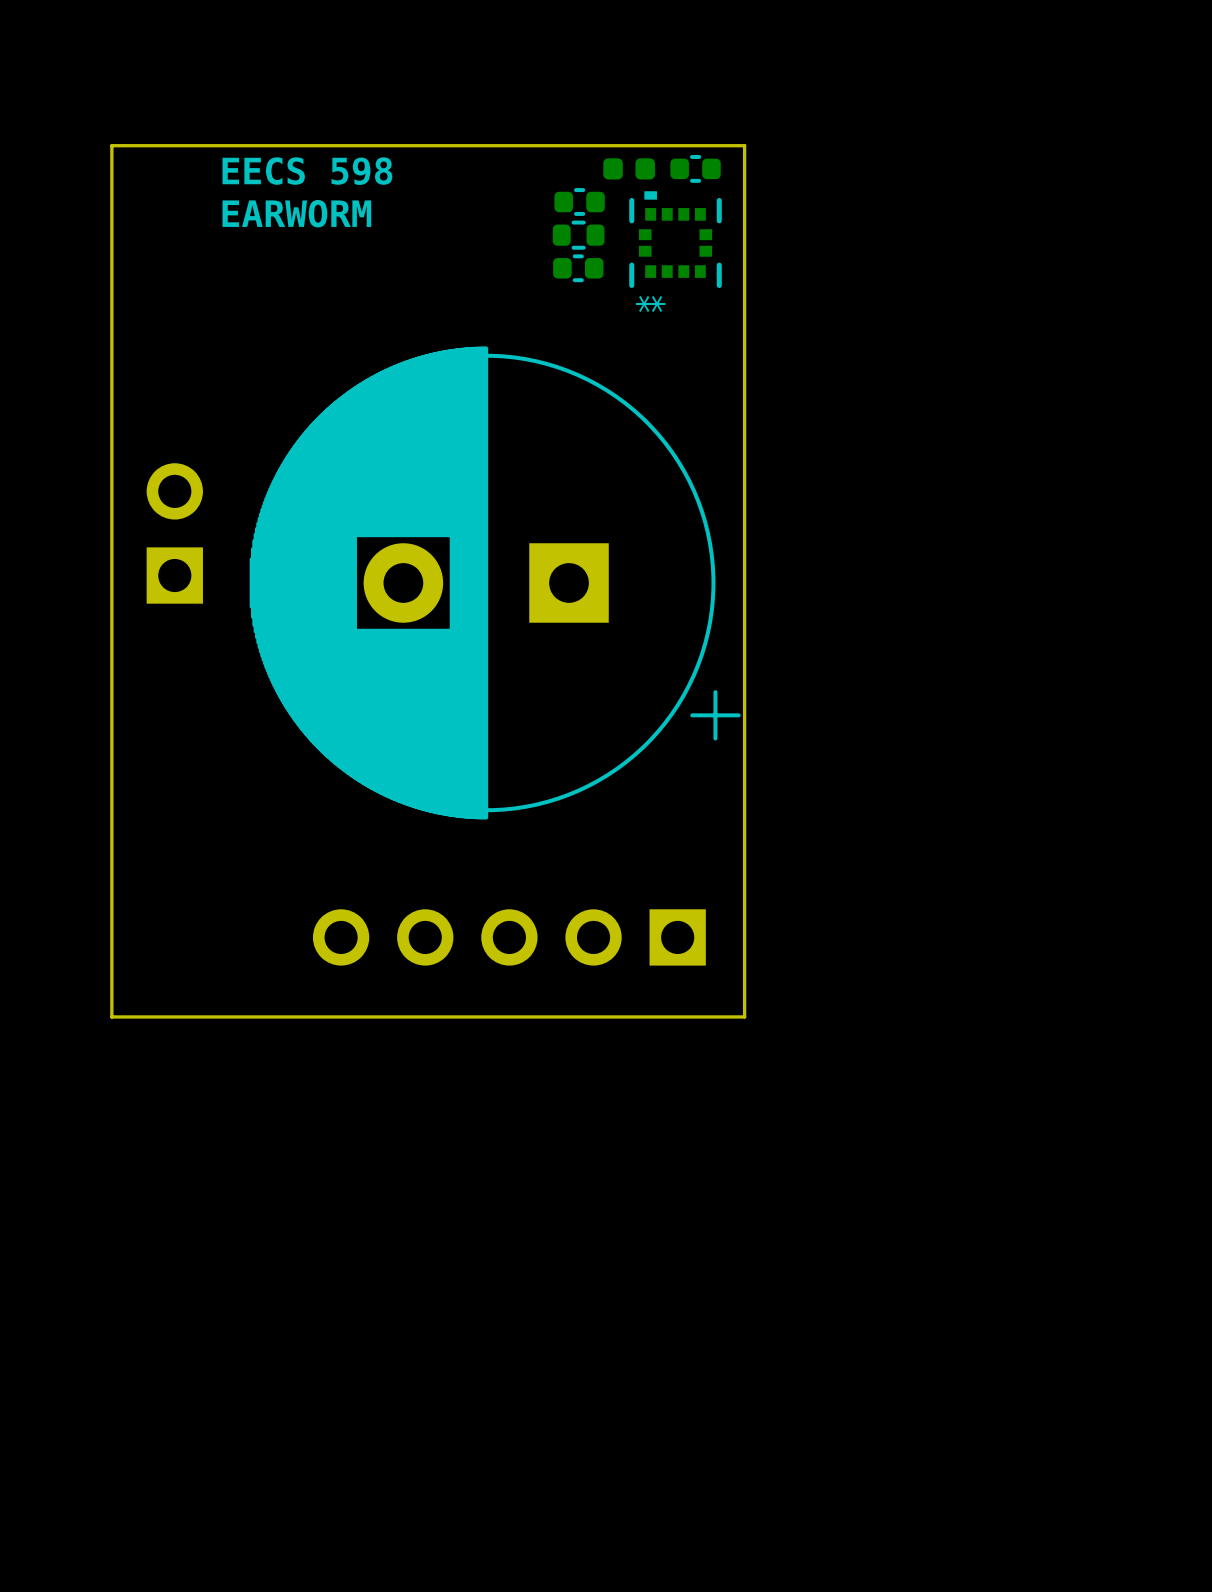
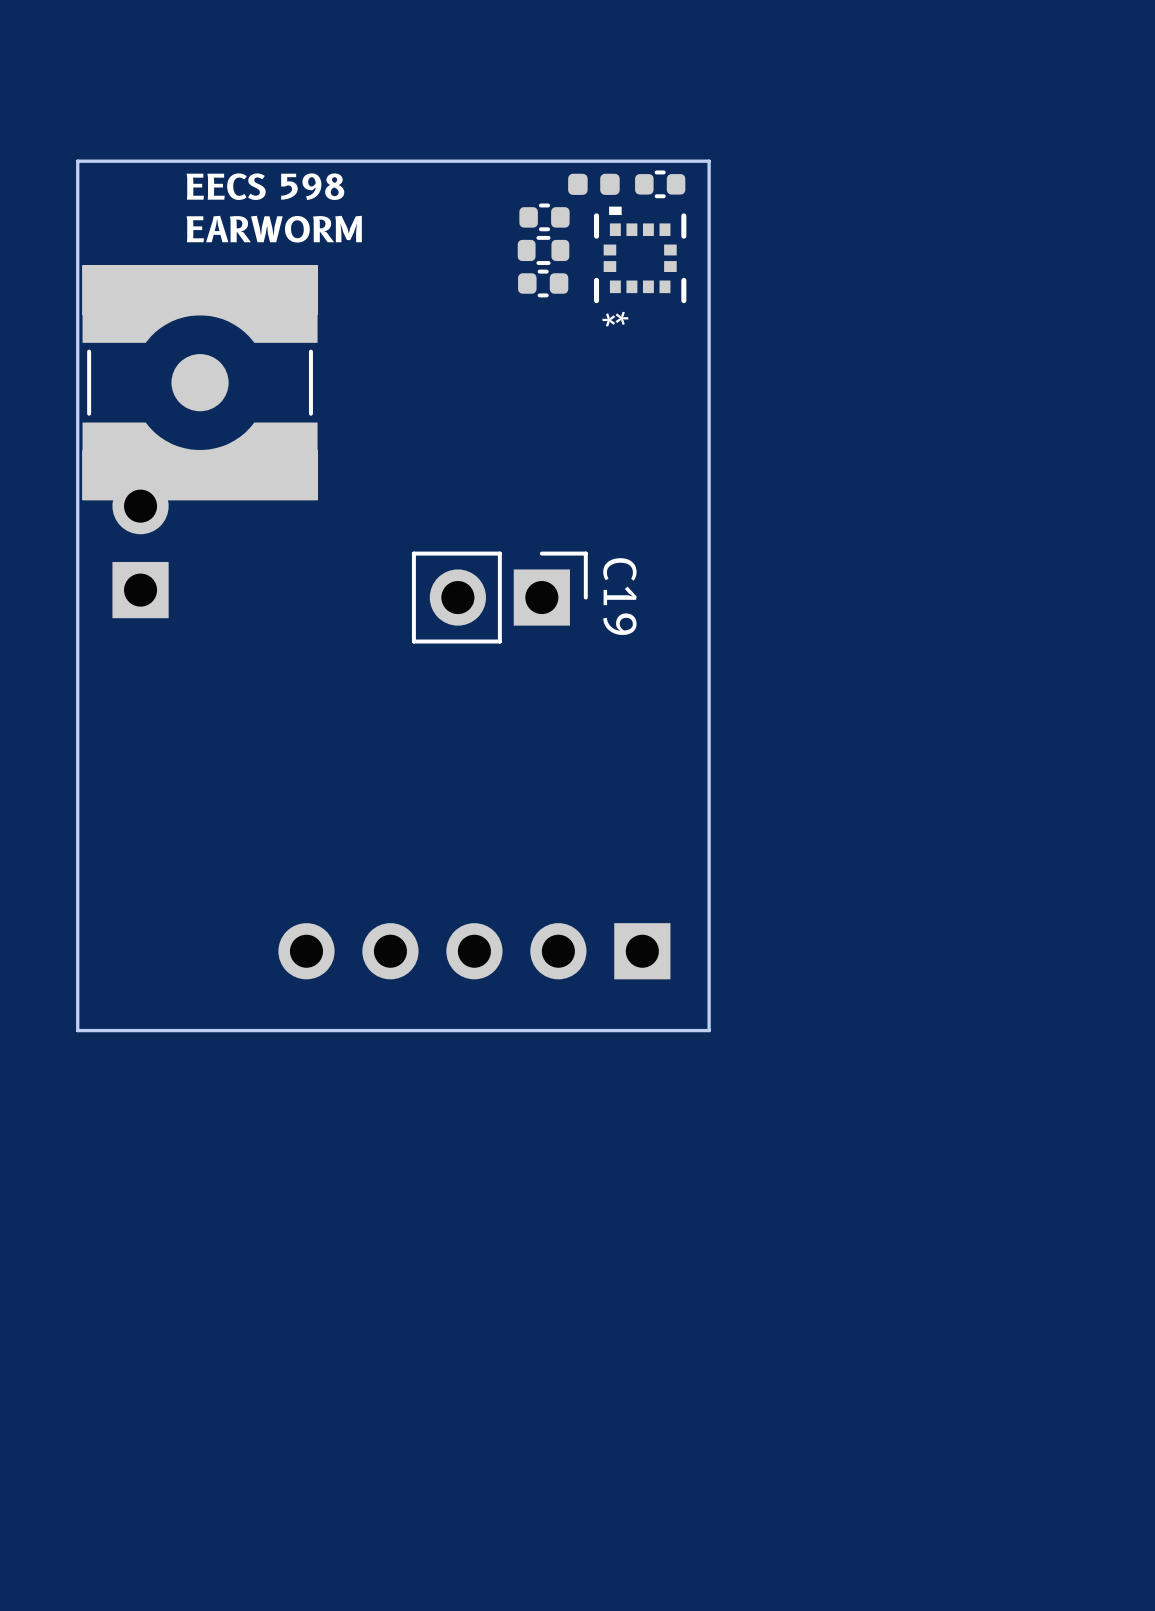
part: none -> (200, 382)
part: (495, 582) -> none
C19: none -> (499, 597)

